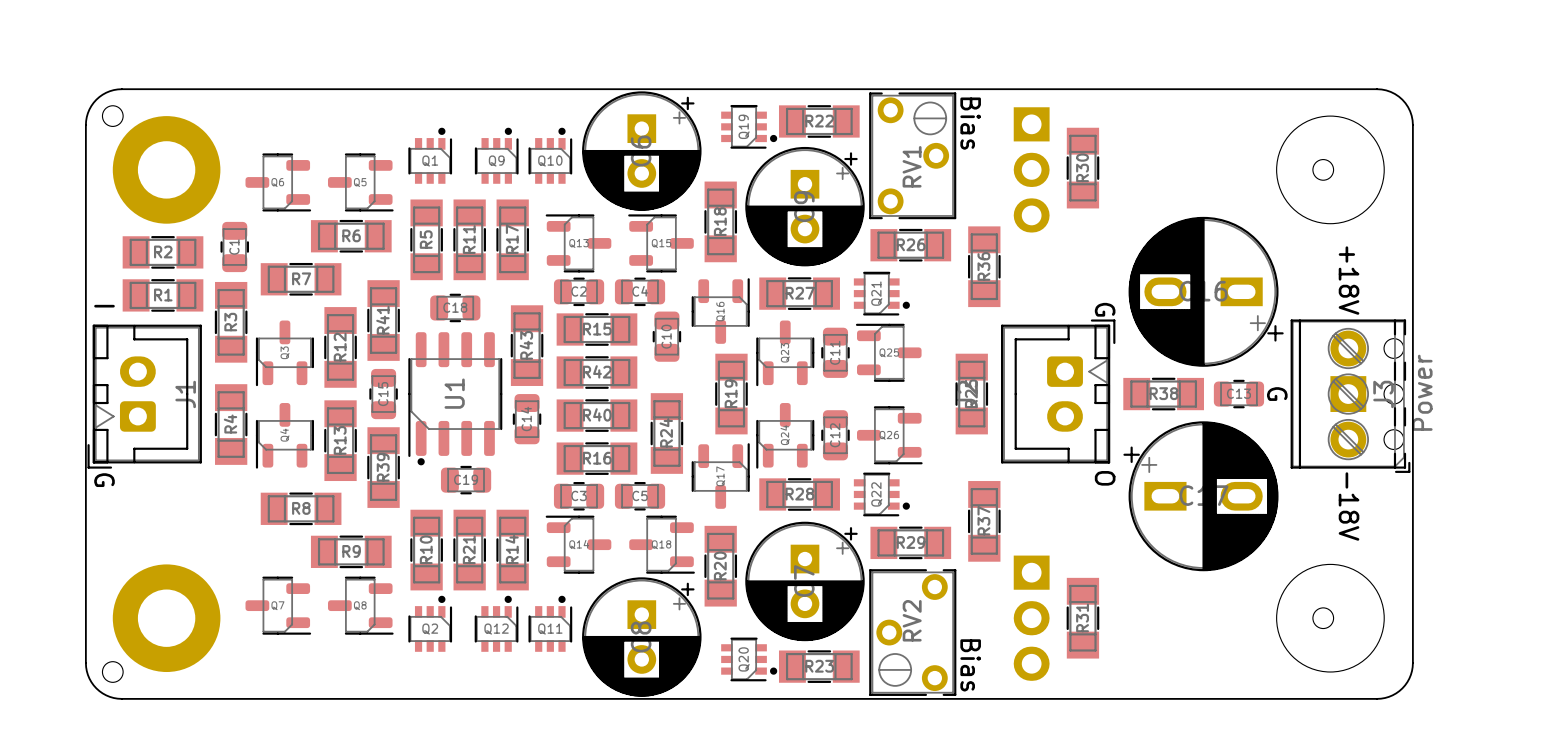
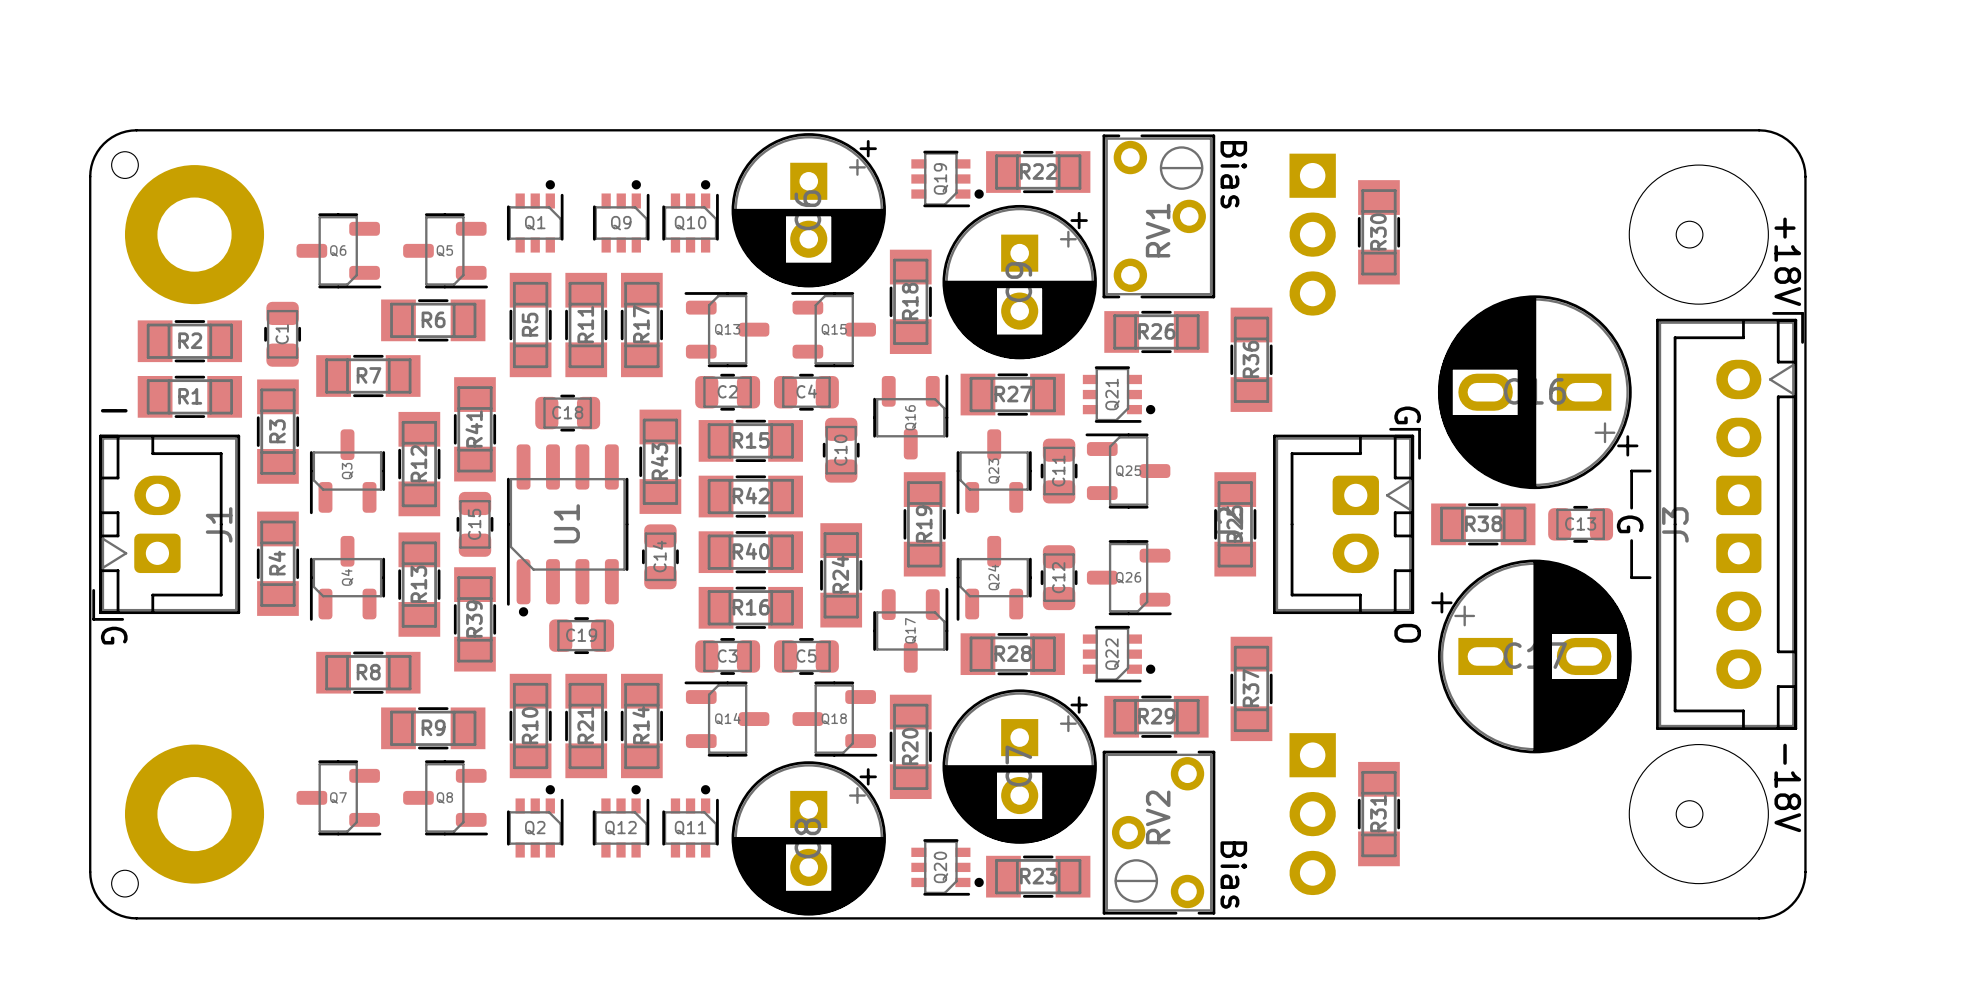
text position: +18V (1349, 280) -> +18V (1787, 261)
J3 footprint: [1290, 319, 1411, 473] -> [1656, 312, 1804, 730]
line: none -> (1650, 471) (1631, 471) (1631, 508)
J3 value: Power (1422, 392) -> none
J3 name position: J3 (1383, 394) -> J3 (1675, 524)
line: none -> (1631, 540) (1631, 577) (1650, 577)
text position: -18V (1349, 506) -> -18V (1787, 787)

